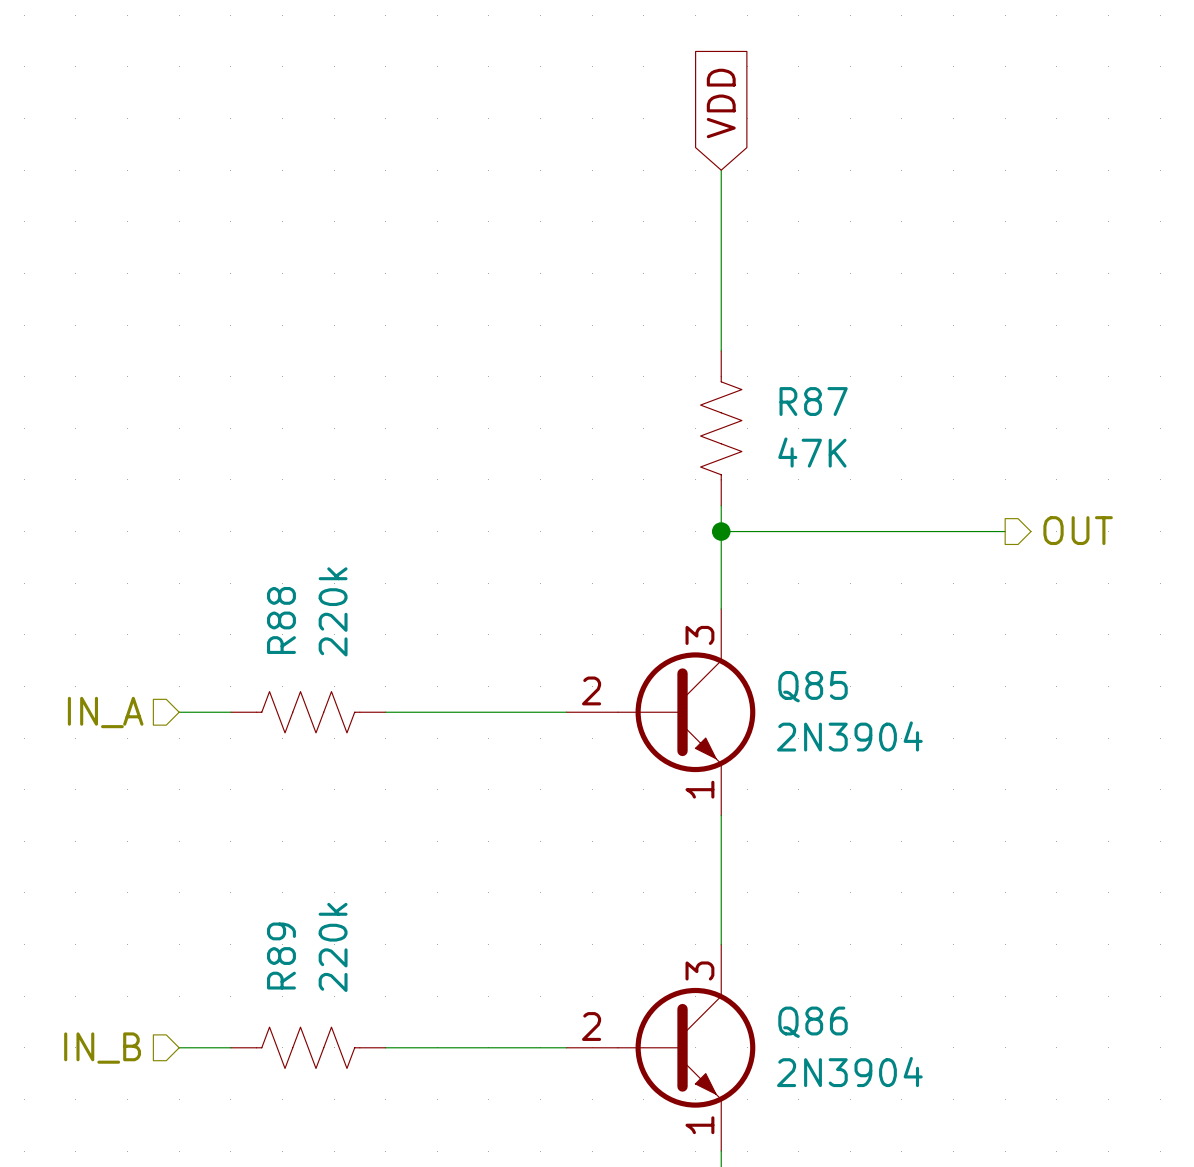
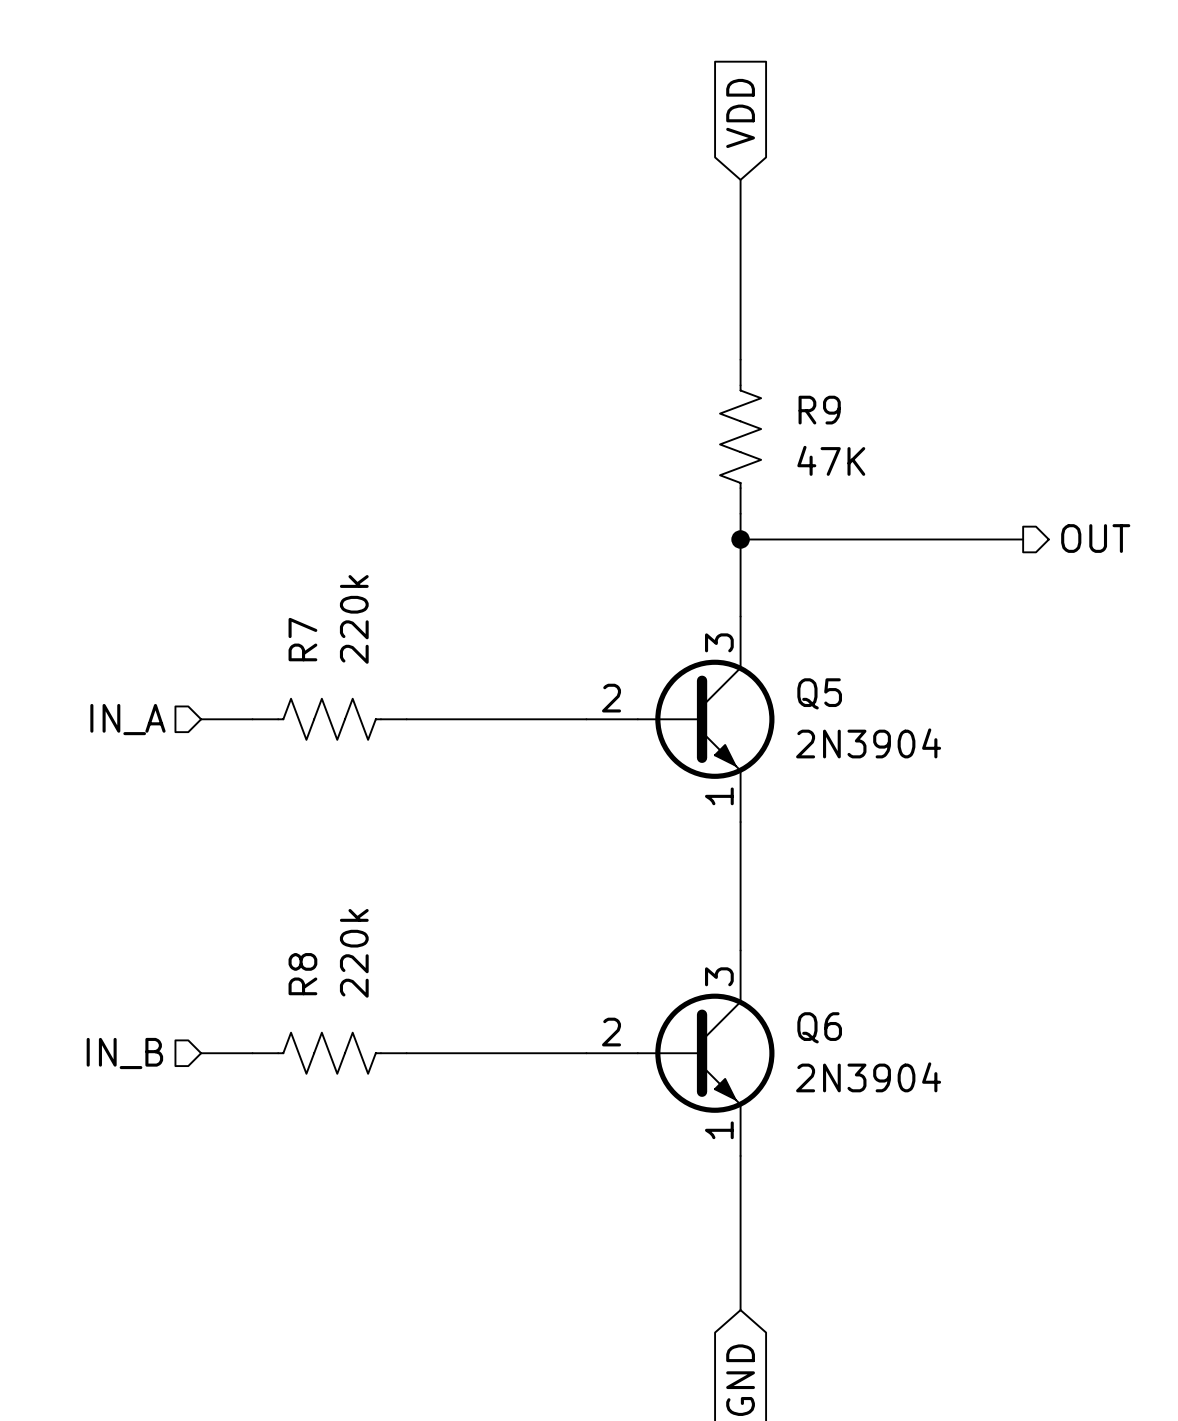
R87 name: R87 (813, 401) -> R9 (819, 410)
R88 name: R88 (281, 620) -> R7 (302, 639)
Q85 name: Q85 (813, 686) -> Q5 (819, 693)
R89 name: R89 (281, 956) -> R8 (302, 974)
Q86 name: Q86 (813, 1022) -> Q6 (819, 1027)

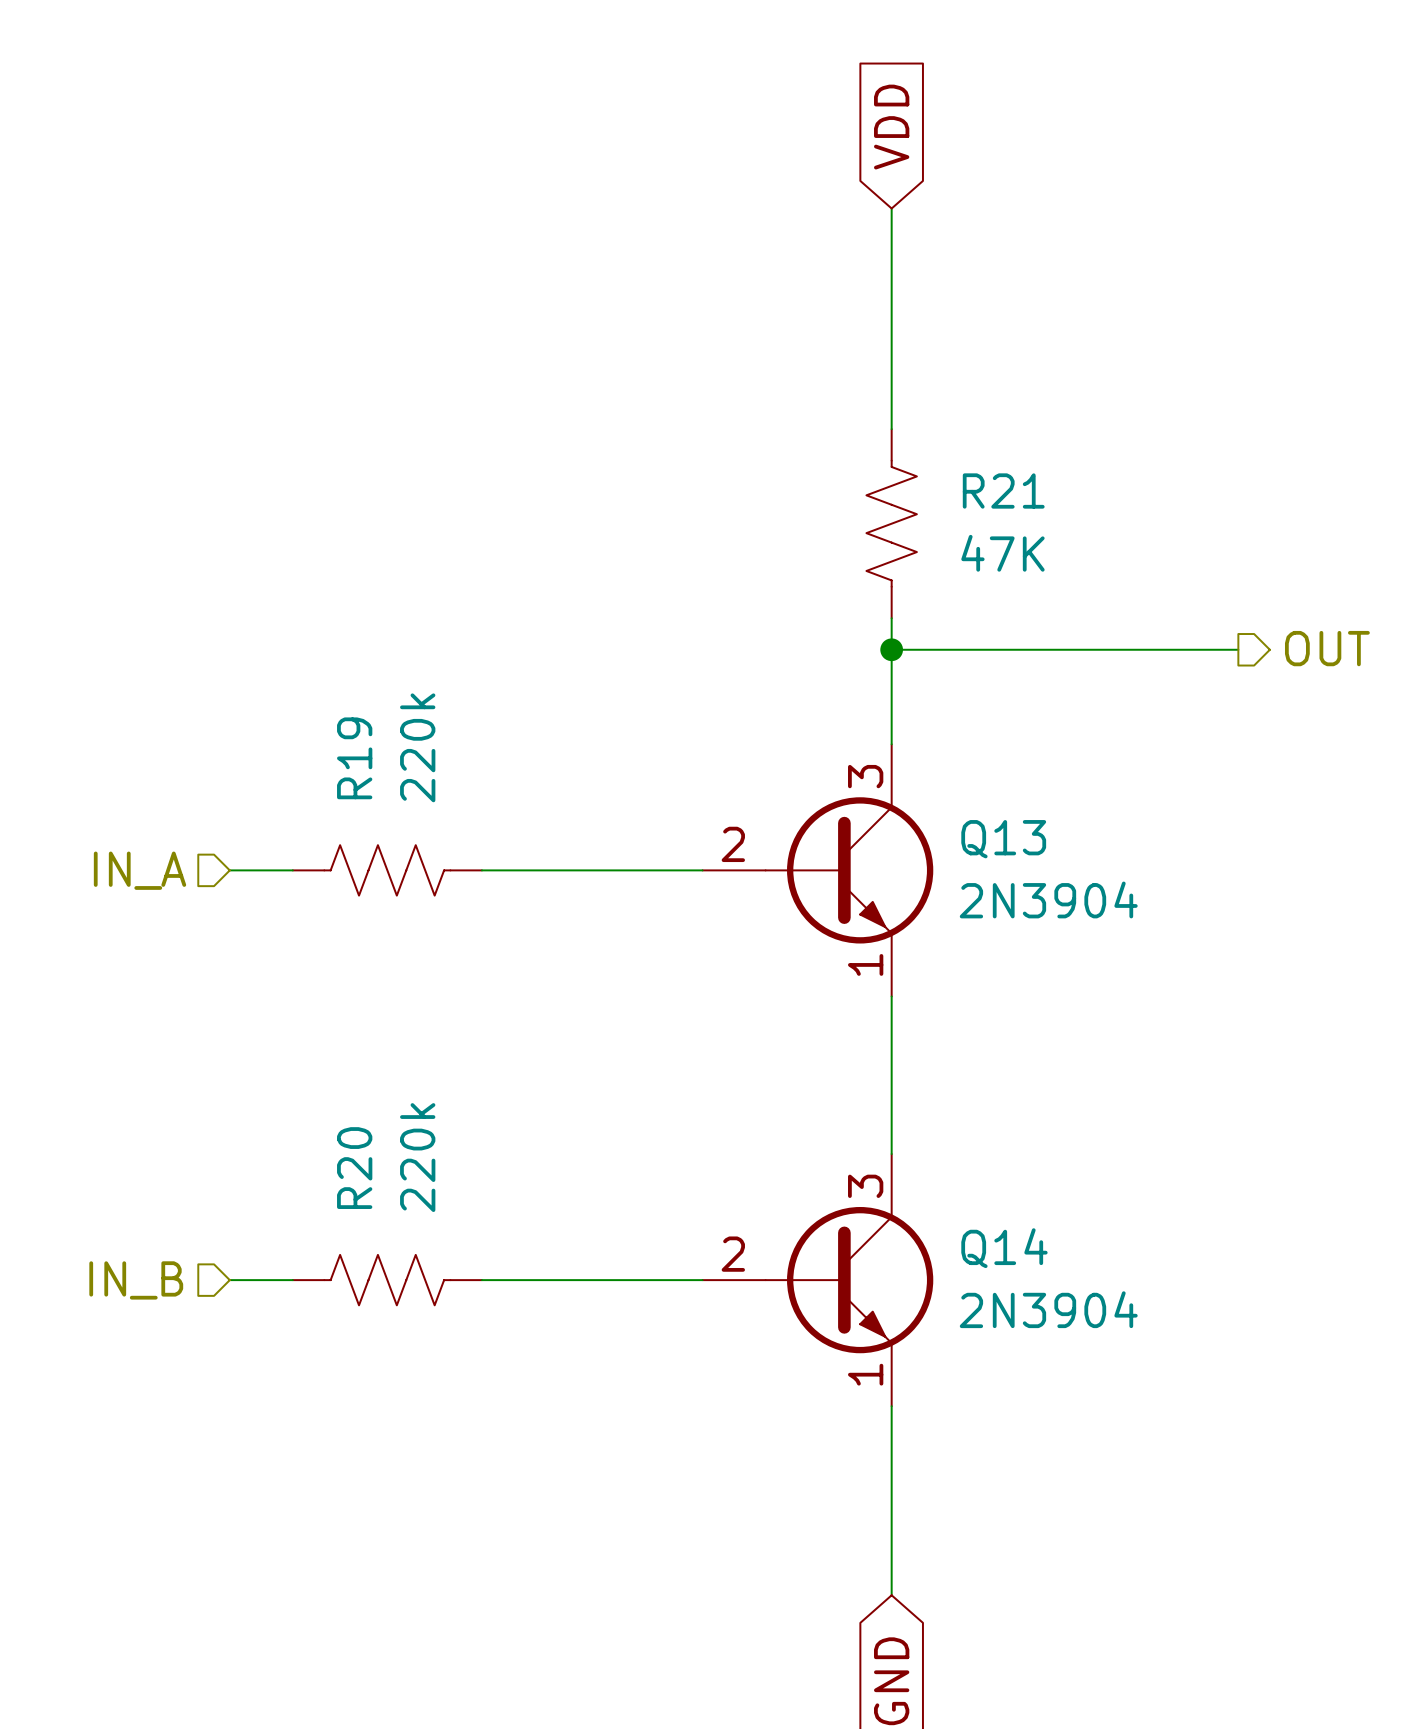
R9 name: R9 (819, 410) -> R21 (1003, 491)
R7 name: R7 (302, 639) -> R19 (354, 758)
Q5 name: Q5 (819, 693) -> Q13 (1003, 839)
R8 name: R8 (302, 974) -> R20 (354, 1168)
Q6 name: Q6 (819, 1027) -> Q14 (1004, 1248)

